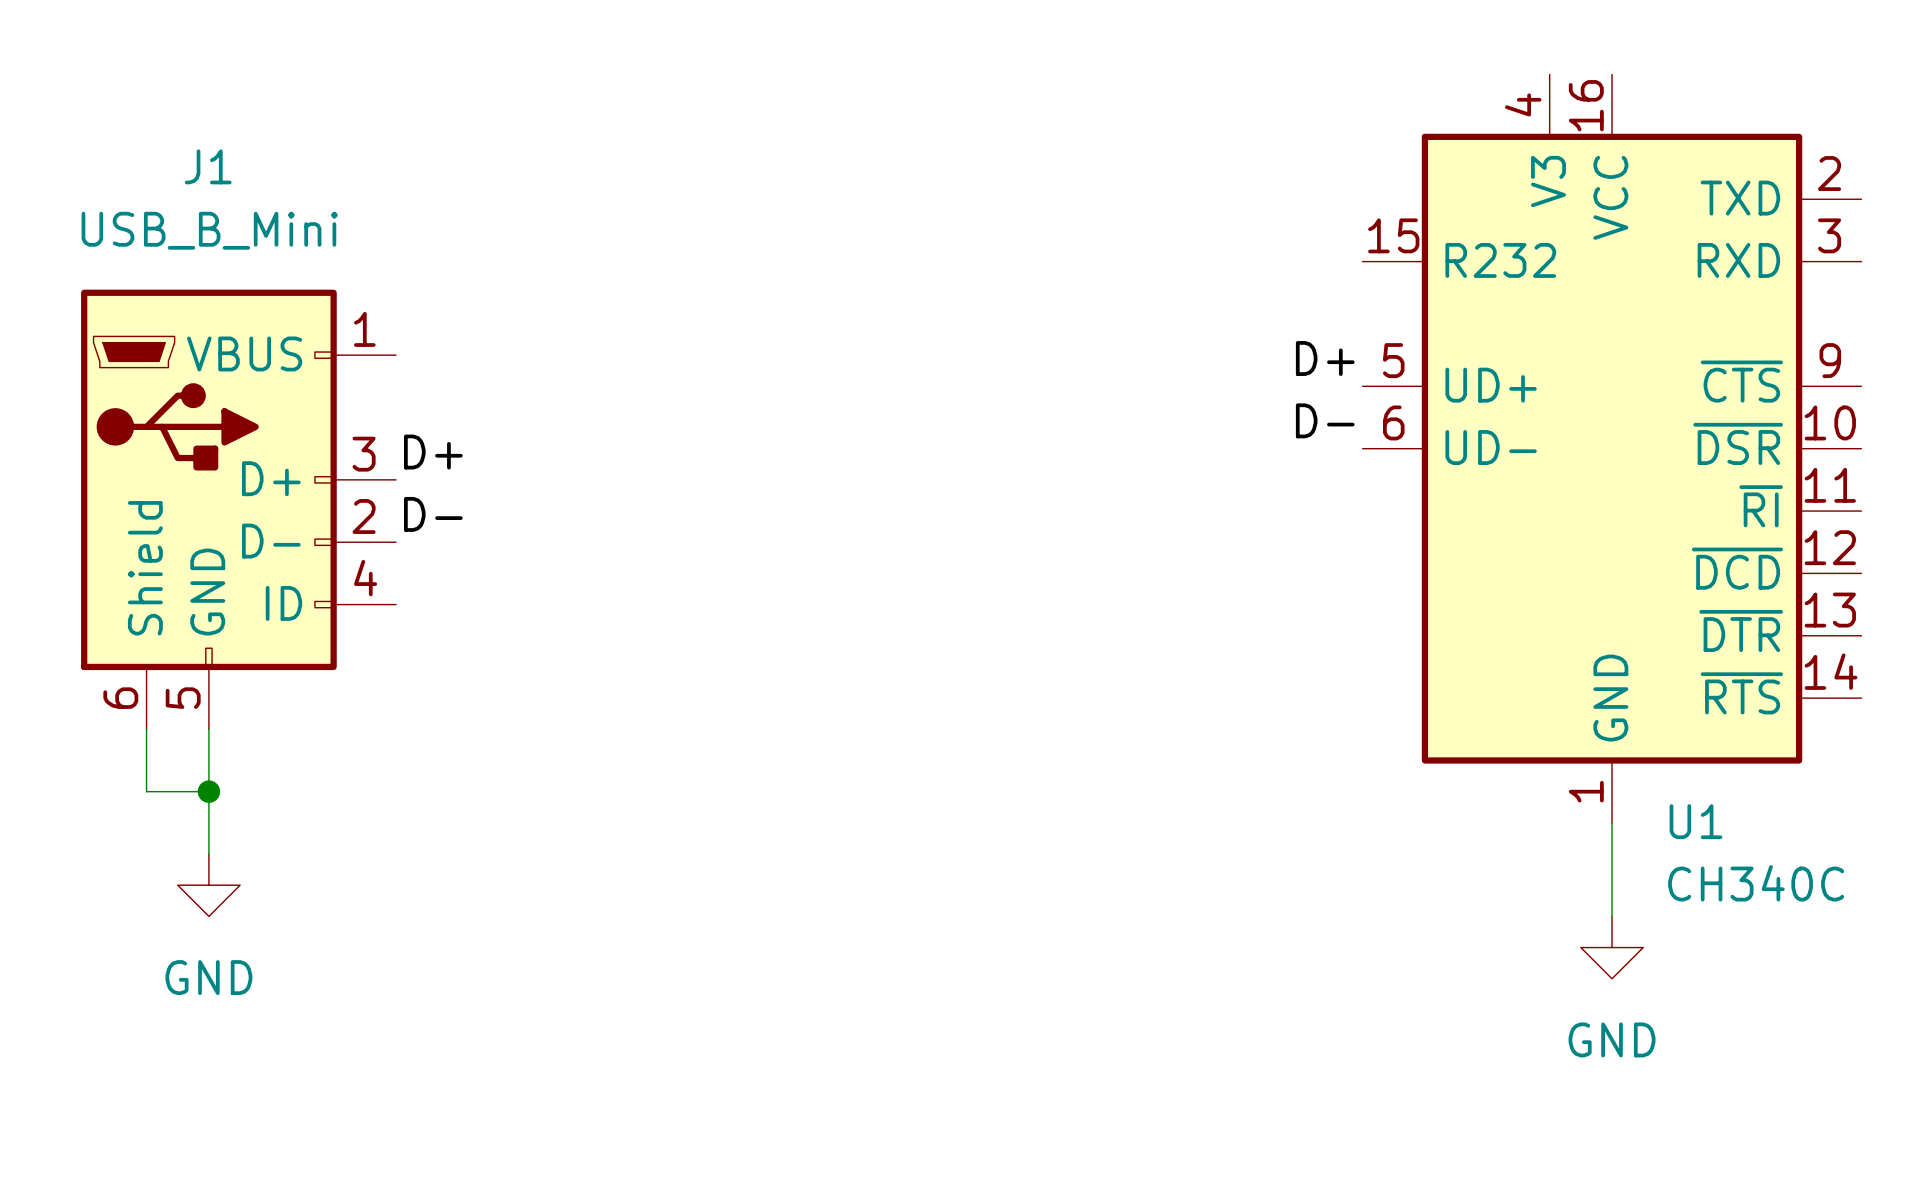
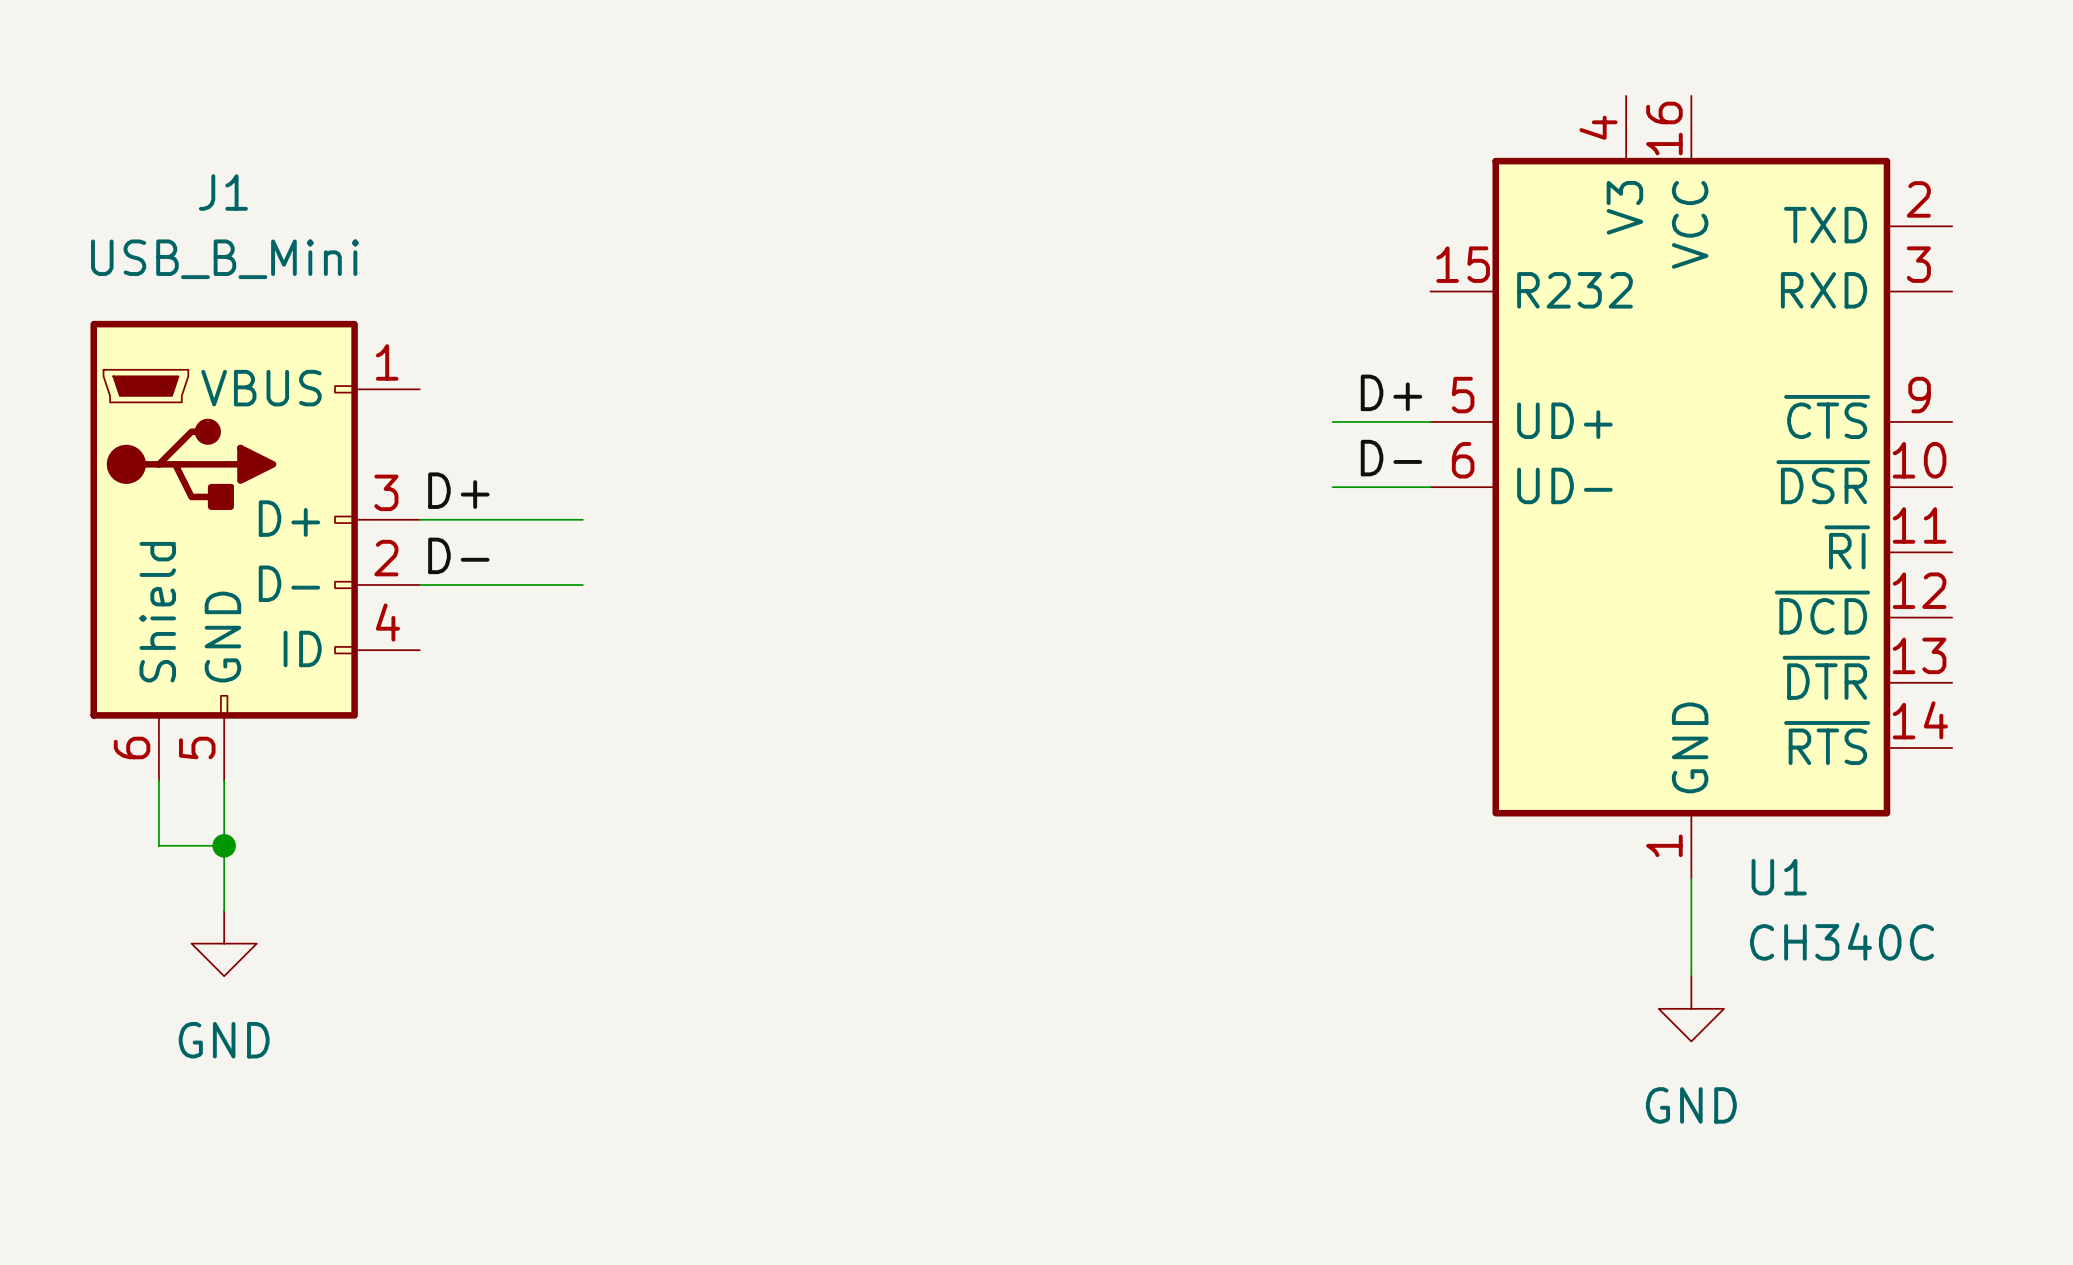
wire: none -> (1332, 421) (1430, 421)
wire: none -> (1332, 487) (1430, 487)
wire: none -> (419, 519) (582, 519)
wire: none -> (419, 584) (582, 584)

